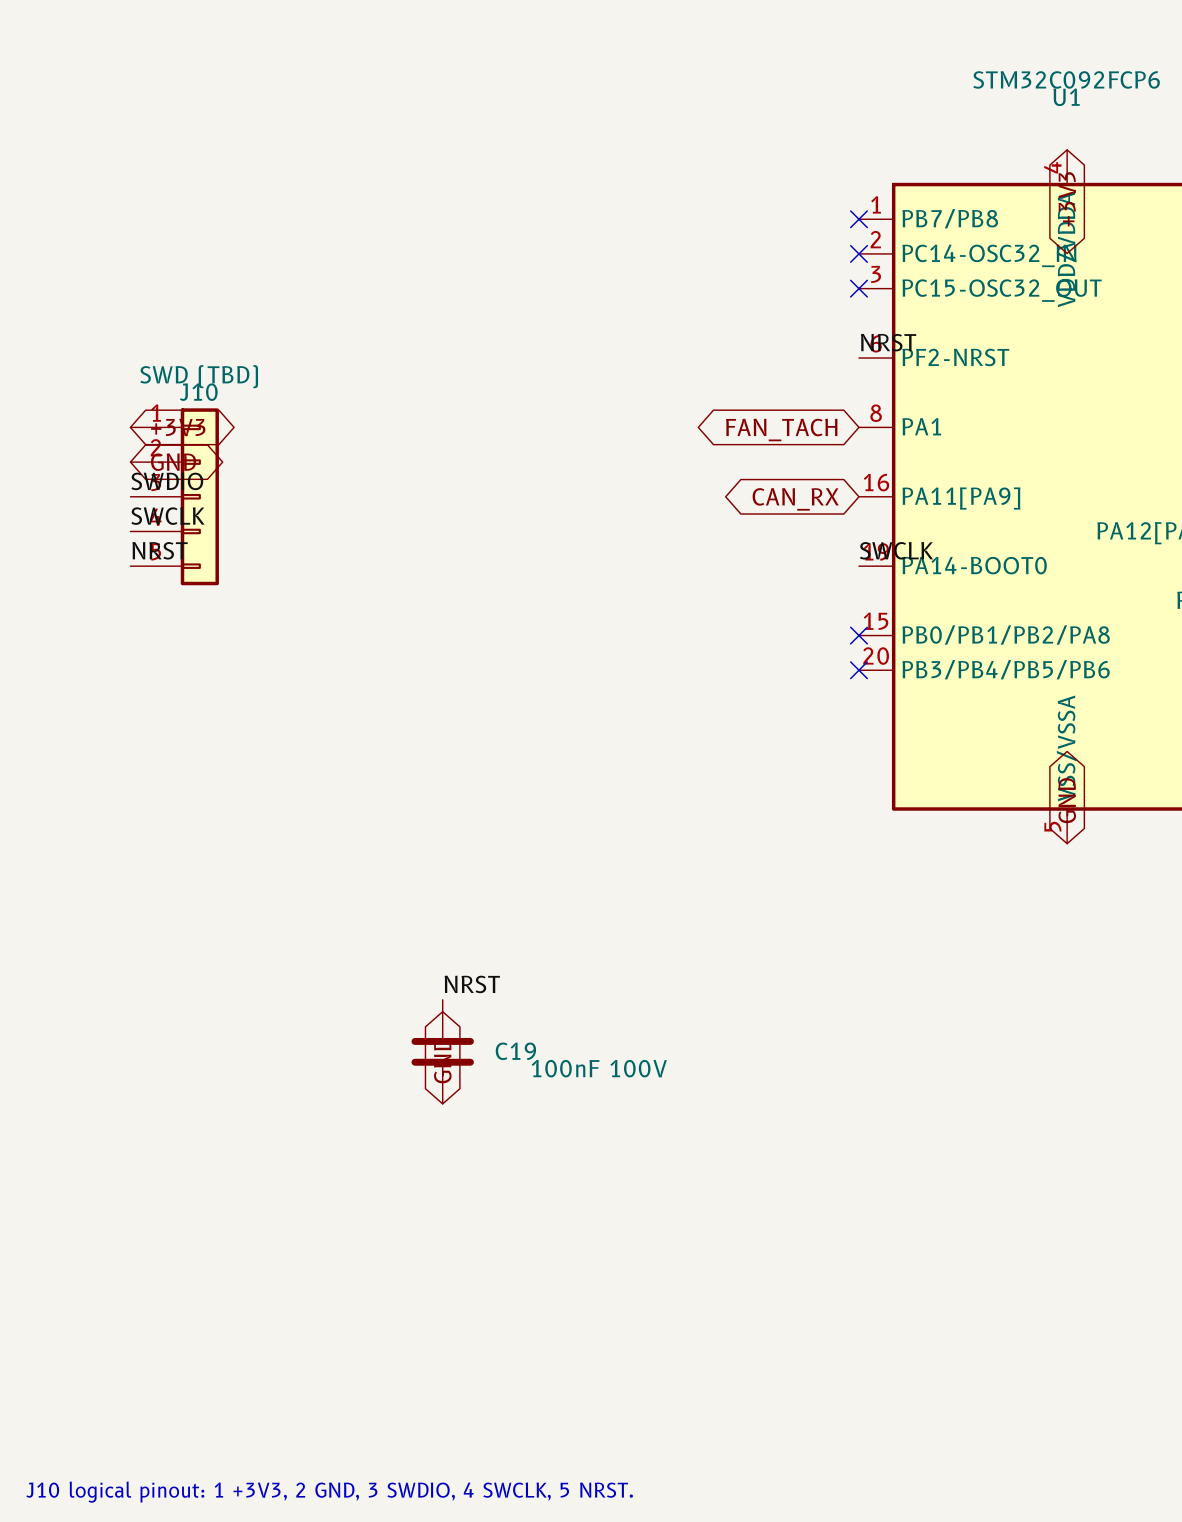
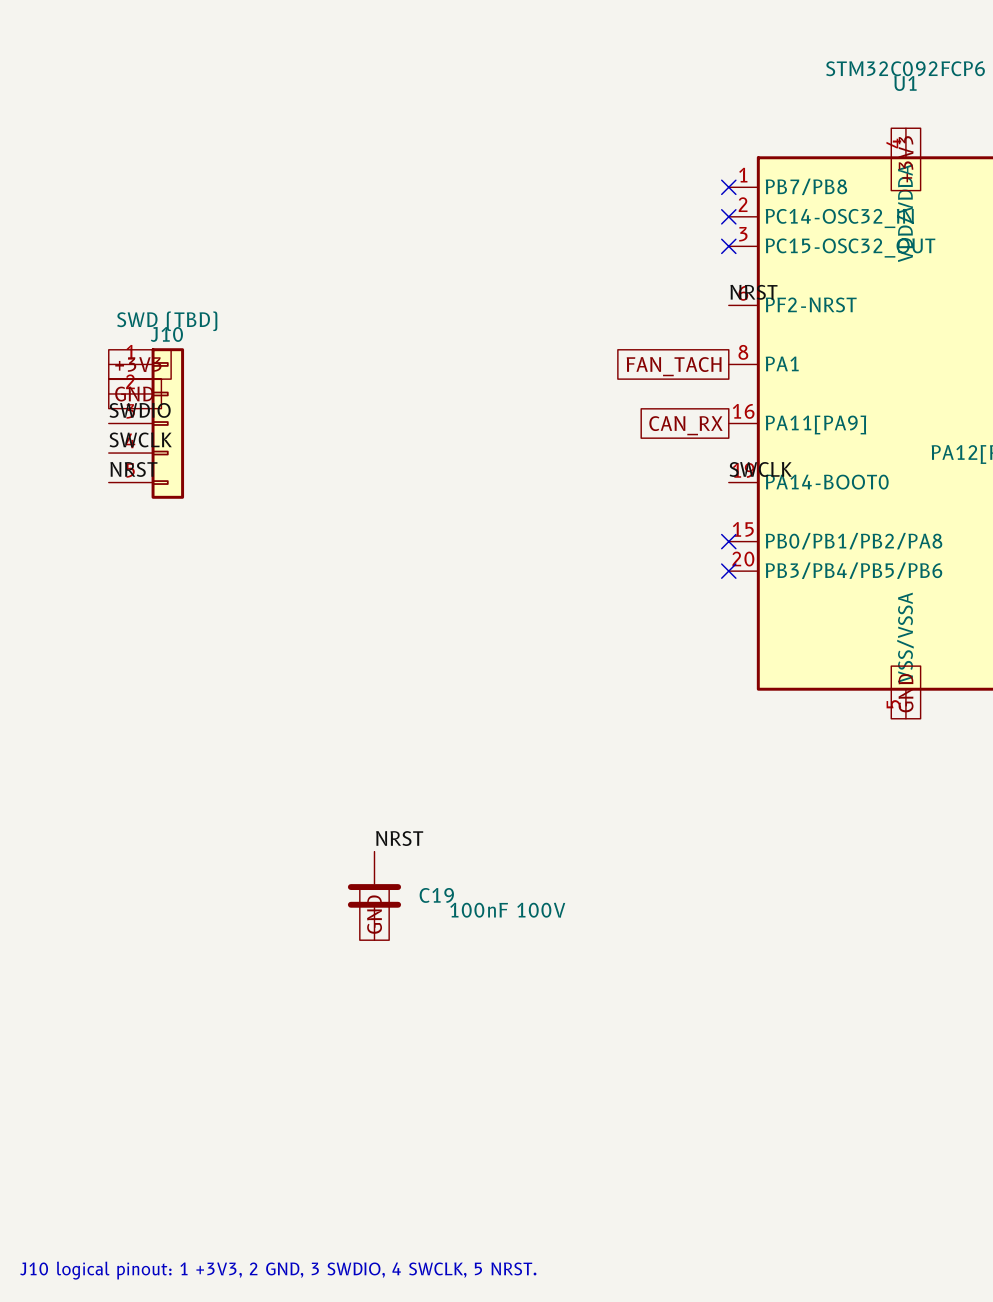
global label shape: bidirectional (1067, 199) -> passive (906, 159)
global label shape: bidirectional (178, 427) -> passive (138, 364)
global label shape: bidirectional (781, 430) -> passive (674, 366)
global label shape: bidirectional (173, 462) -> passive (134, 394)
global label shape: bidirectional (795, 499) -> passive (685, 425)
global label shape: bidirectional (1067, 800) -> passive (906, 693)
global label shape: bidirectional (442, 1060) -> passive (374, 914)

